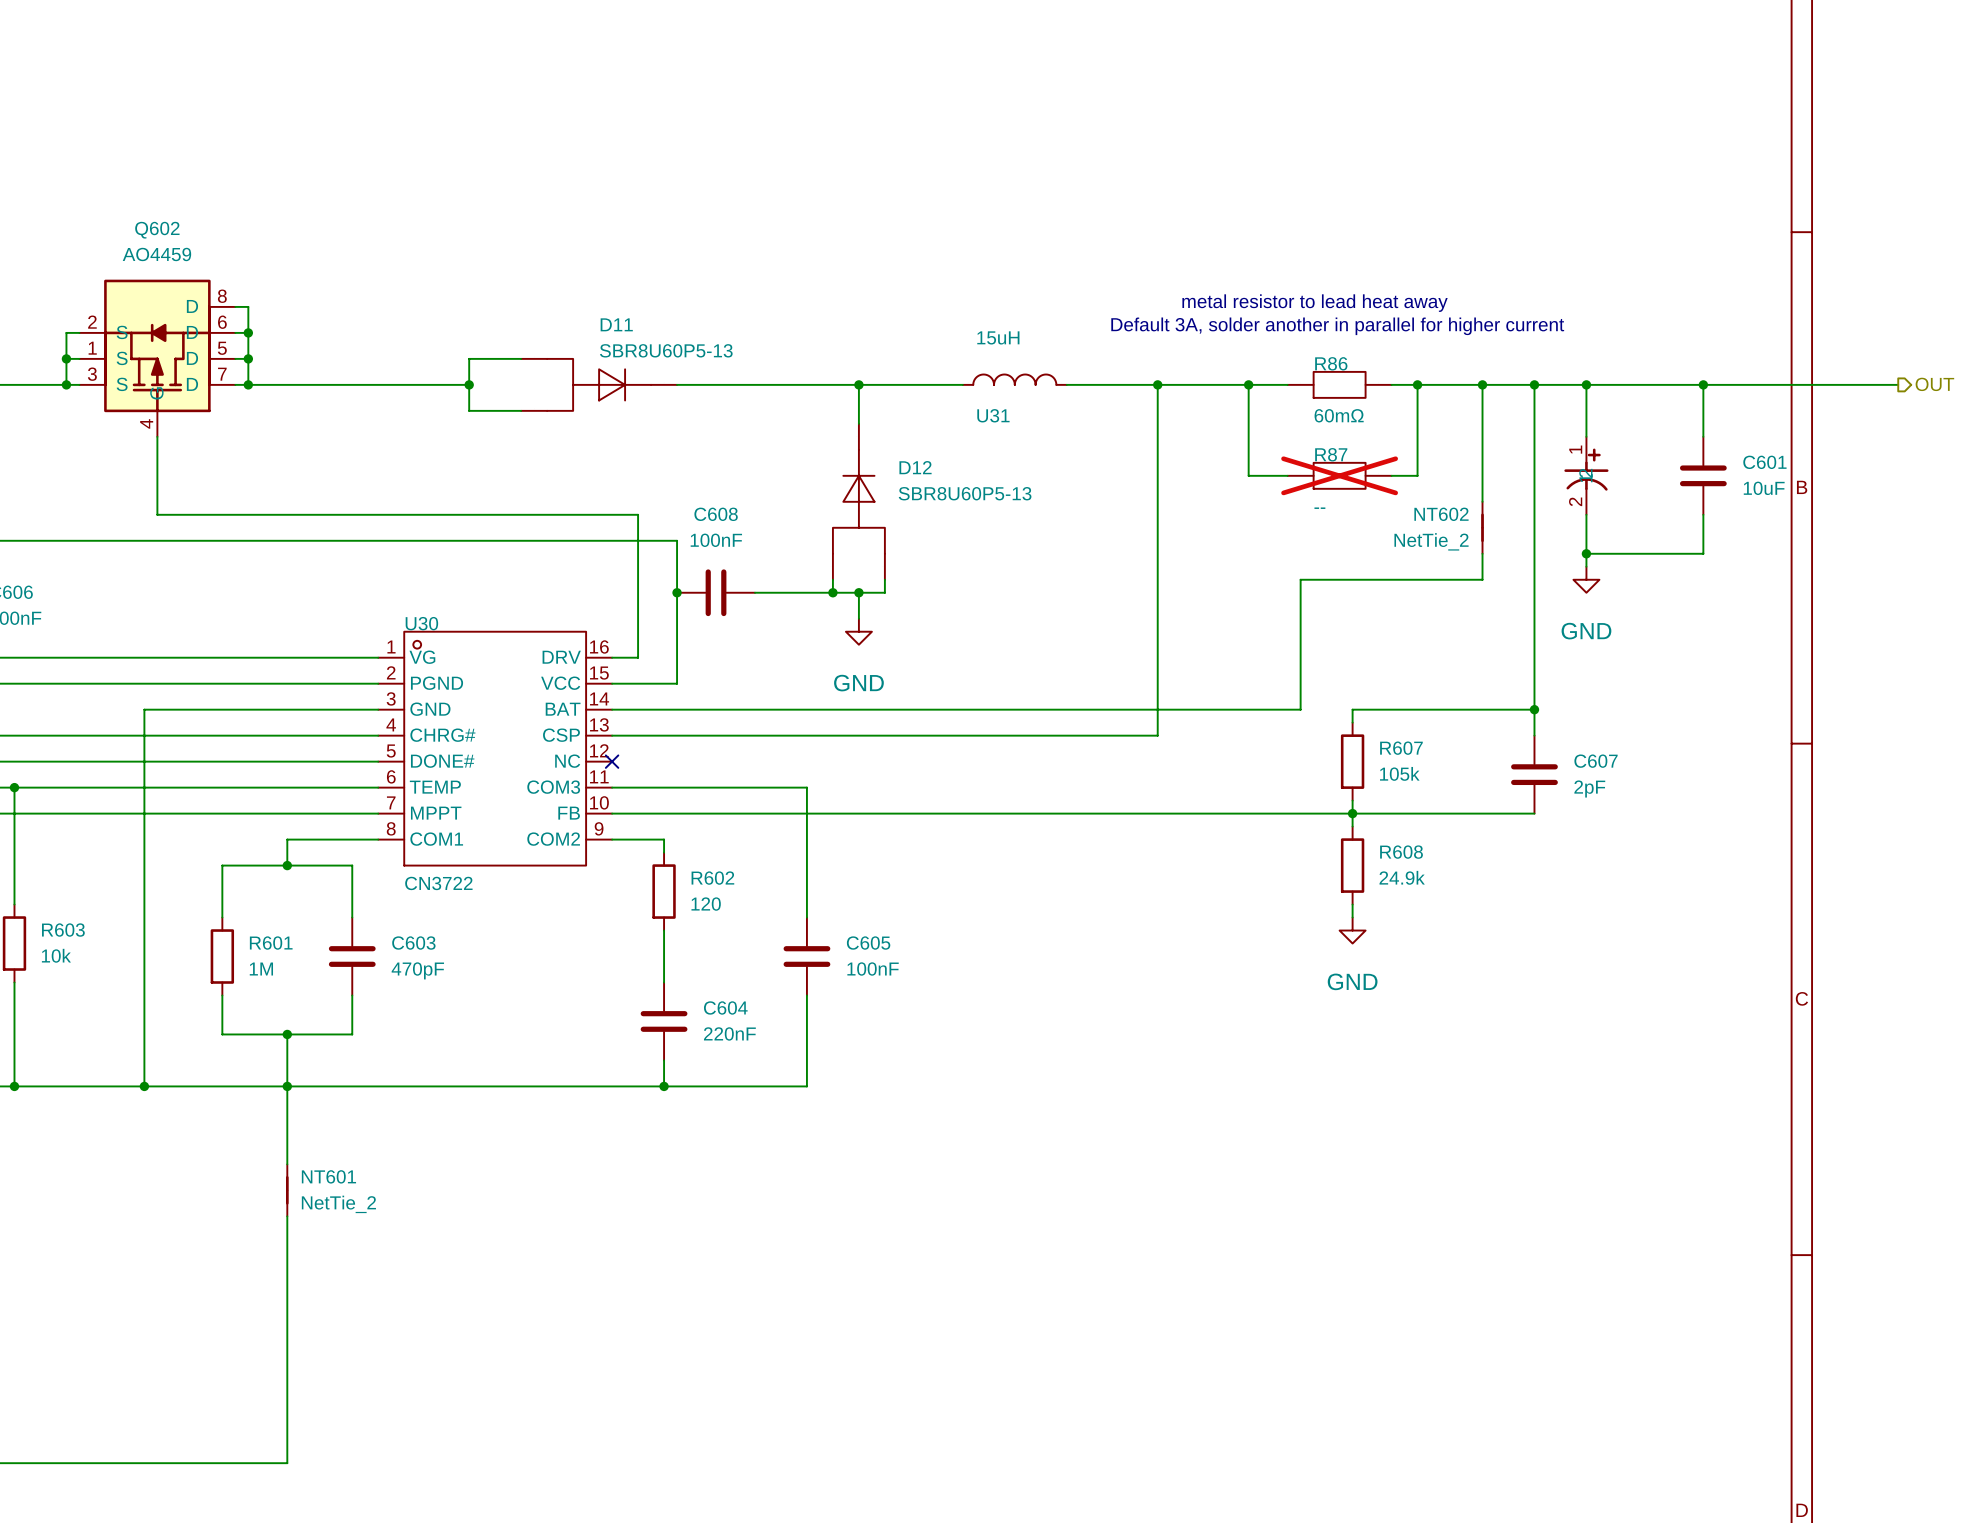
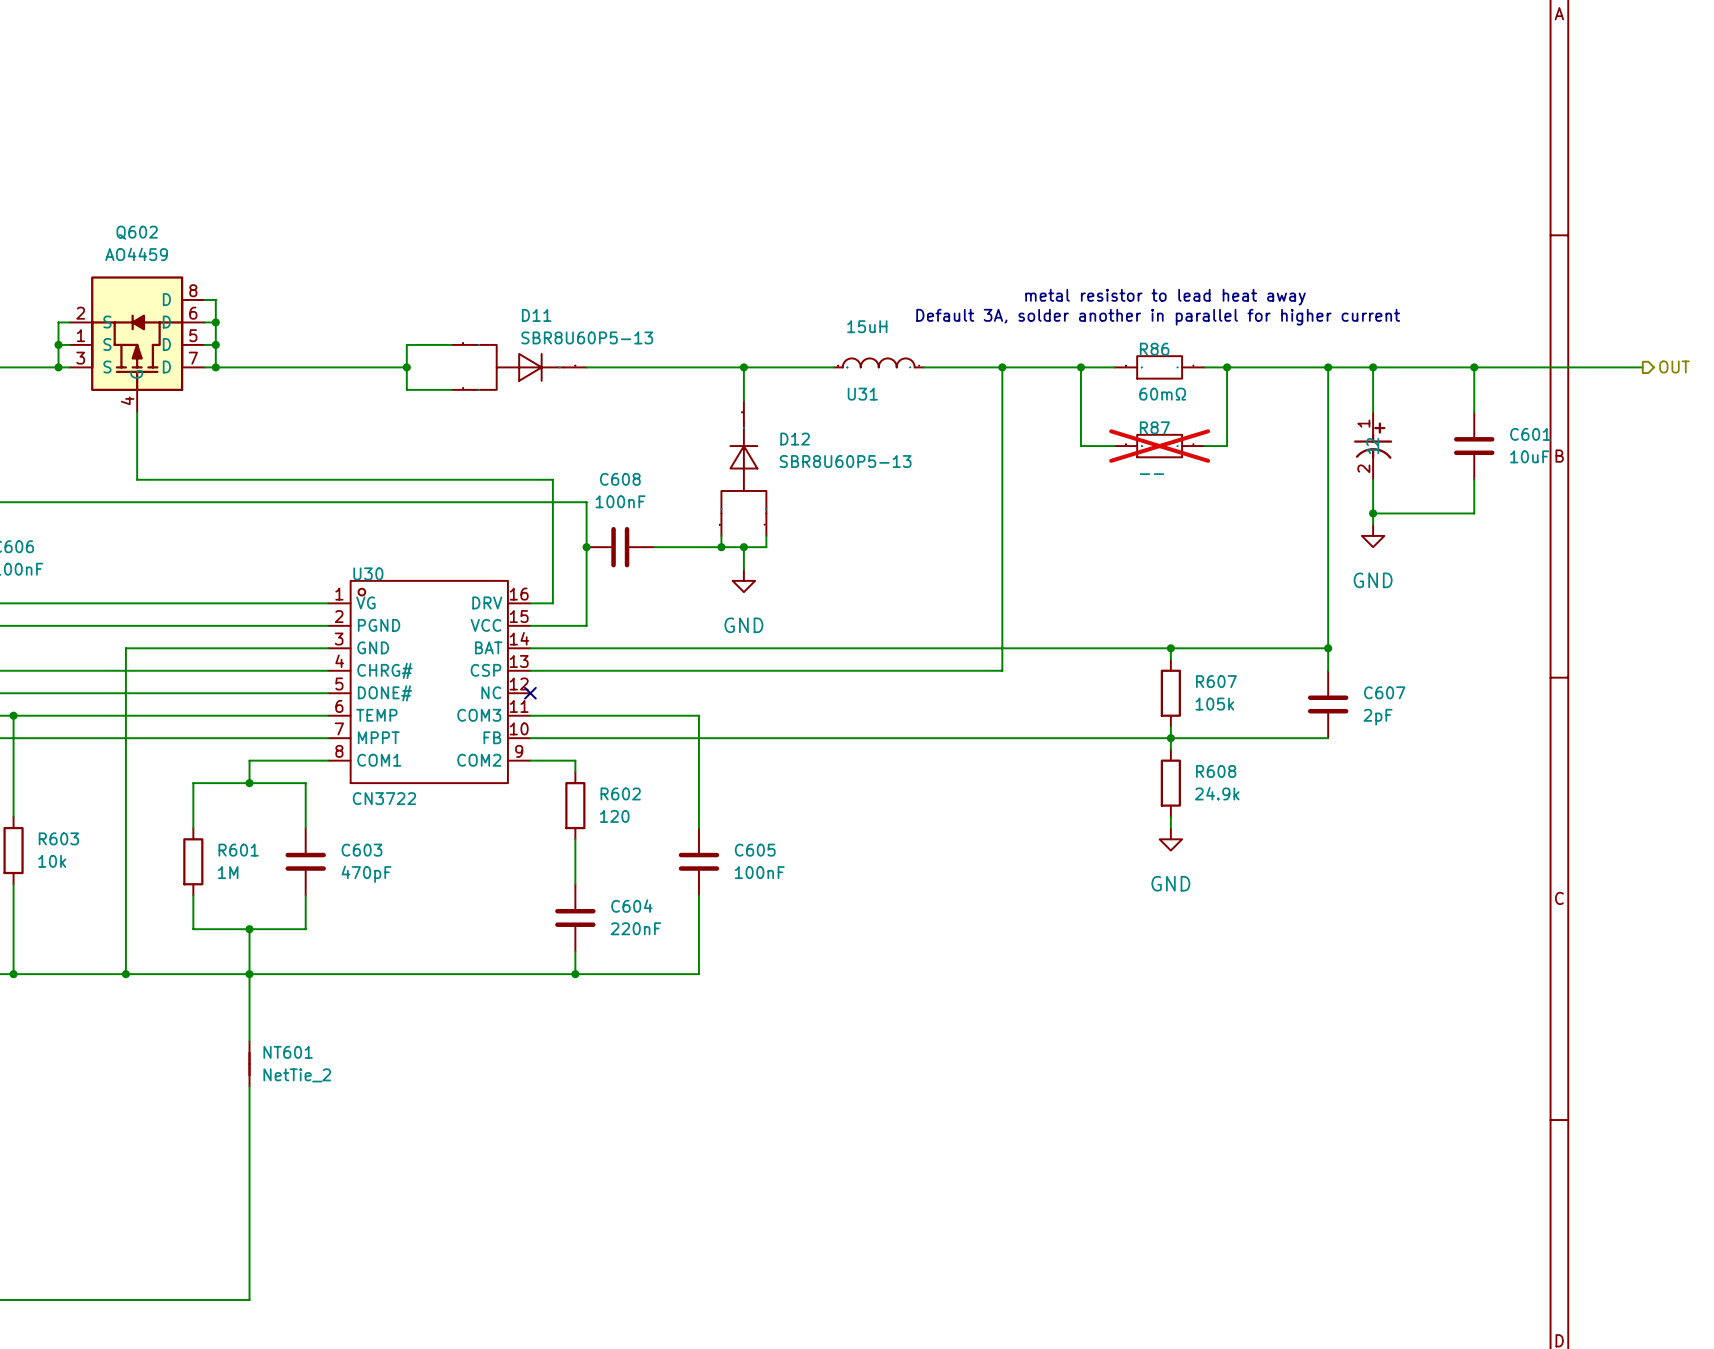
wire: (1482, 384) (1482, 501) -> none
junction: (1482, 384) -> none
NT602: NetTie_2 (1482, 527) -> none
wire: (1482, 553) (1482, 579) (1300, 579) (1300, 709) -> (1170, 648) (1125, 648)
junction: none -> (1170, 648)

